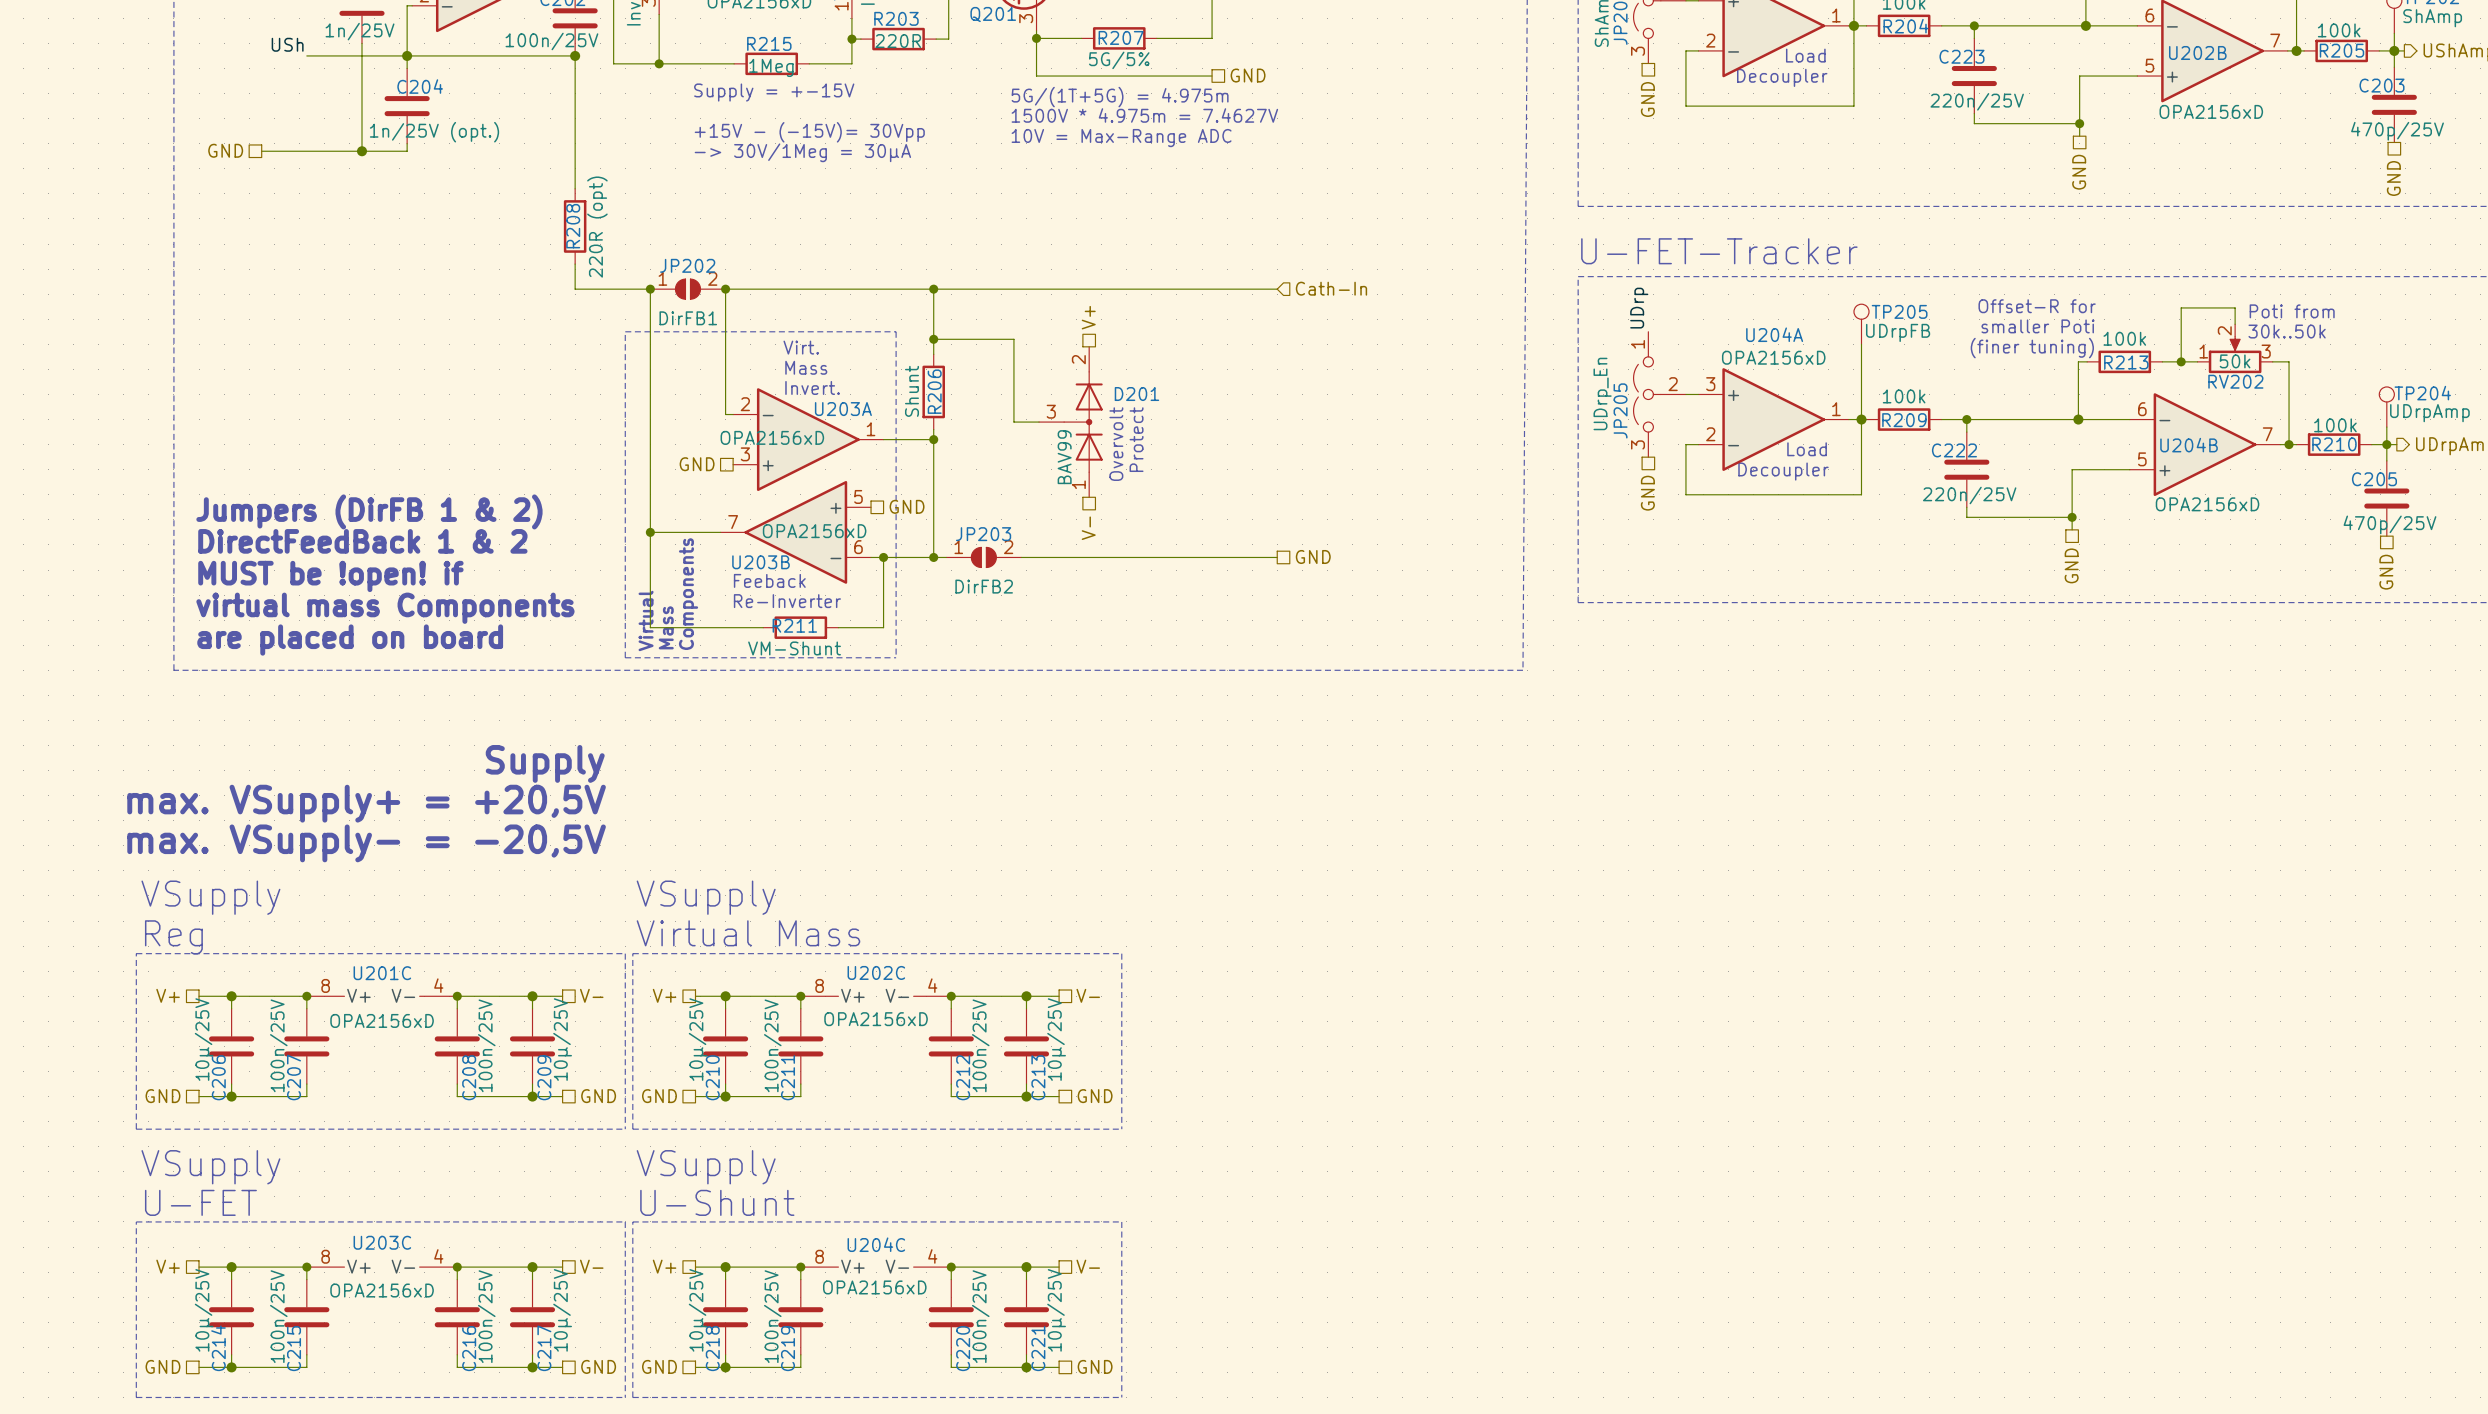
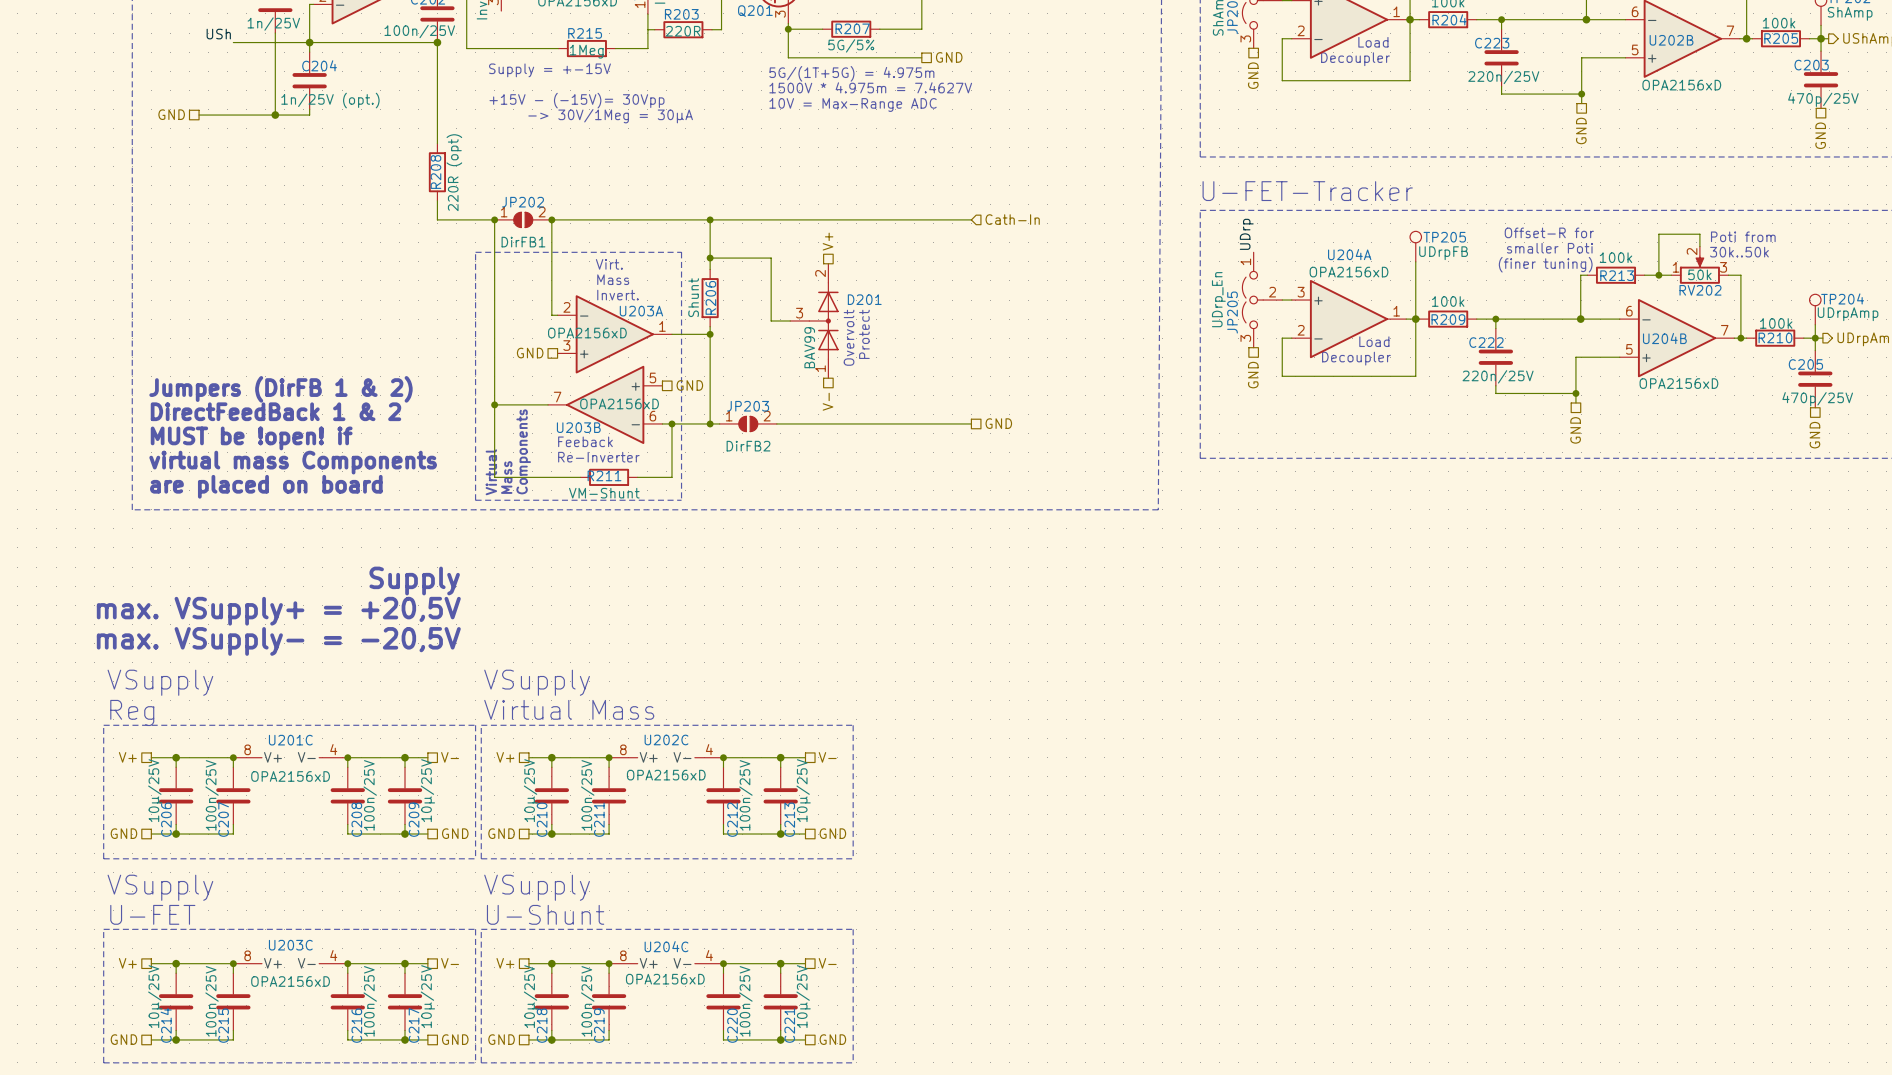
wire: (659, 14) (659, 63) -> none
junction: (851, 39) -> none
junction: (659, 63) -> none
text position: Supply = +-15V (774, 92) -> Supply = +-15V (549, 70)
text position: +15V - (-15V)= 30Vpp (809, 132) -> +15V - (-15V)= 30Vpp (576, 100)

